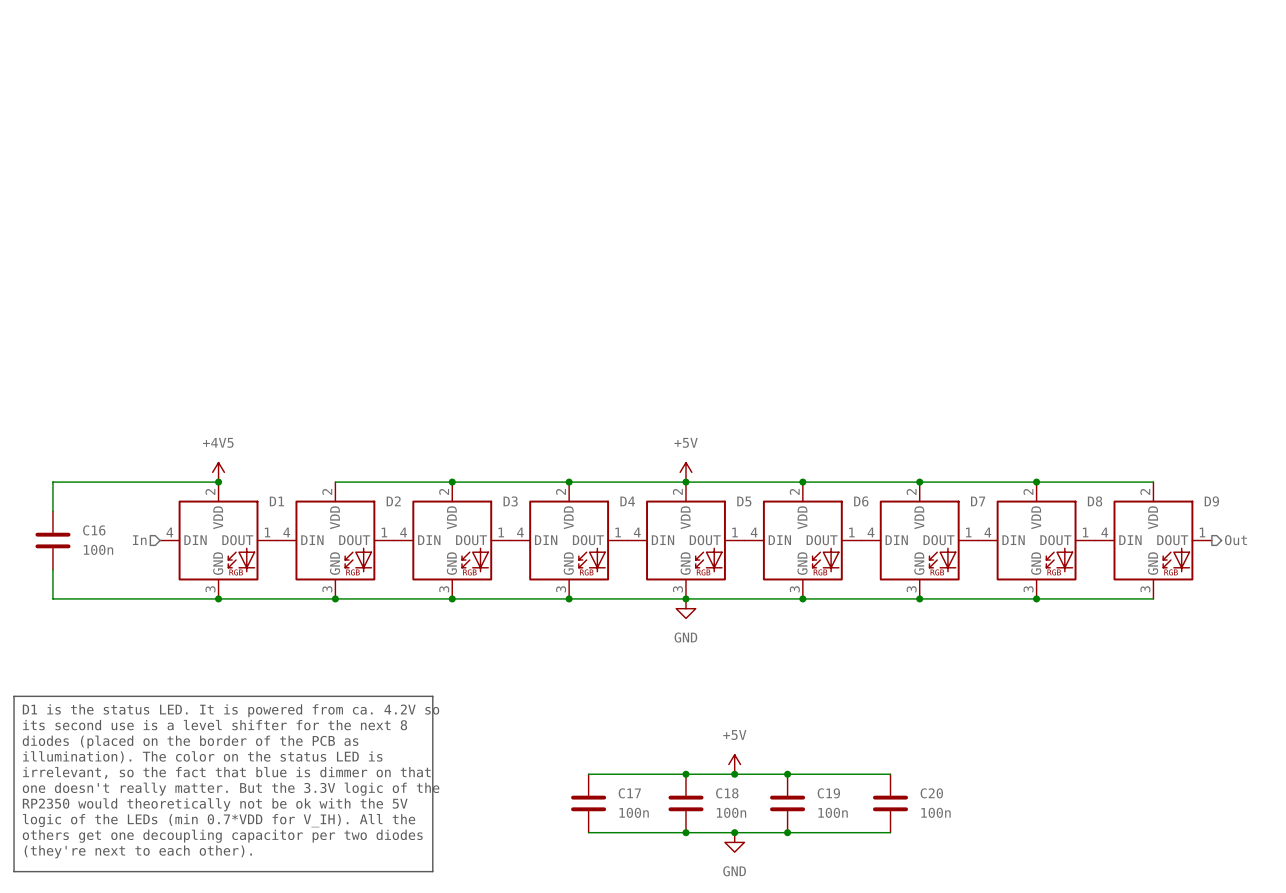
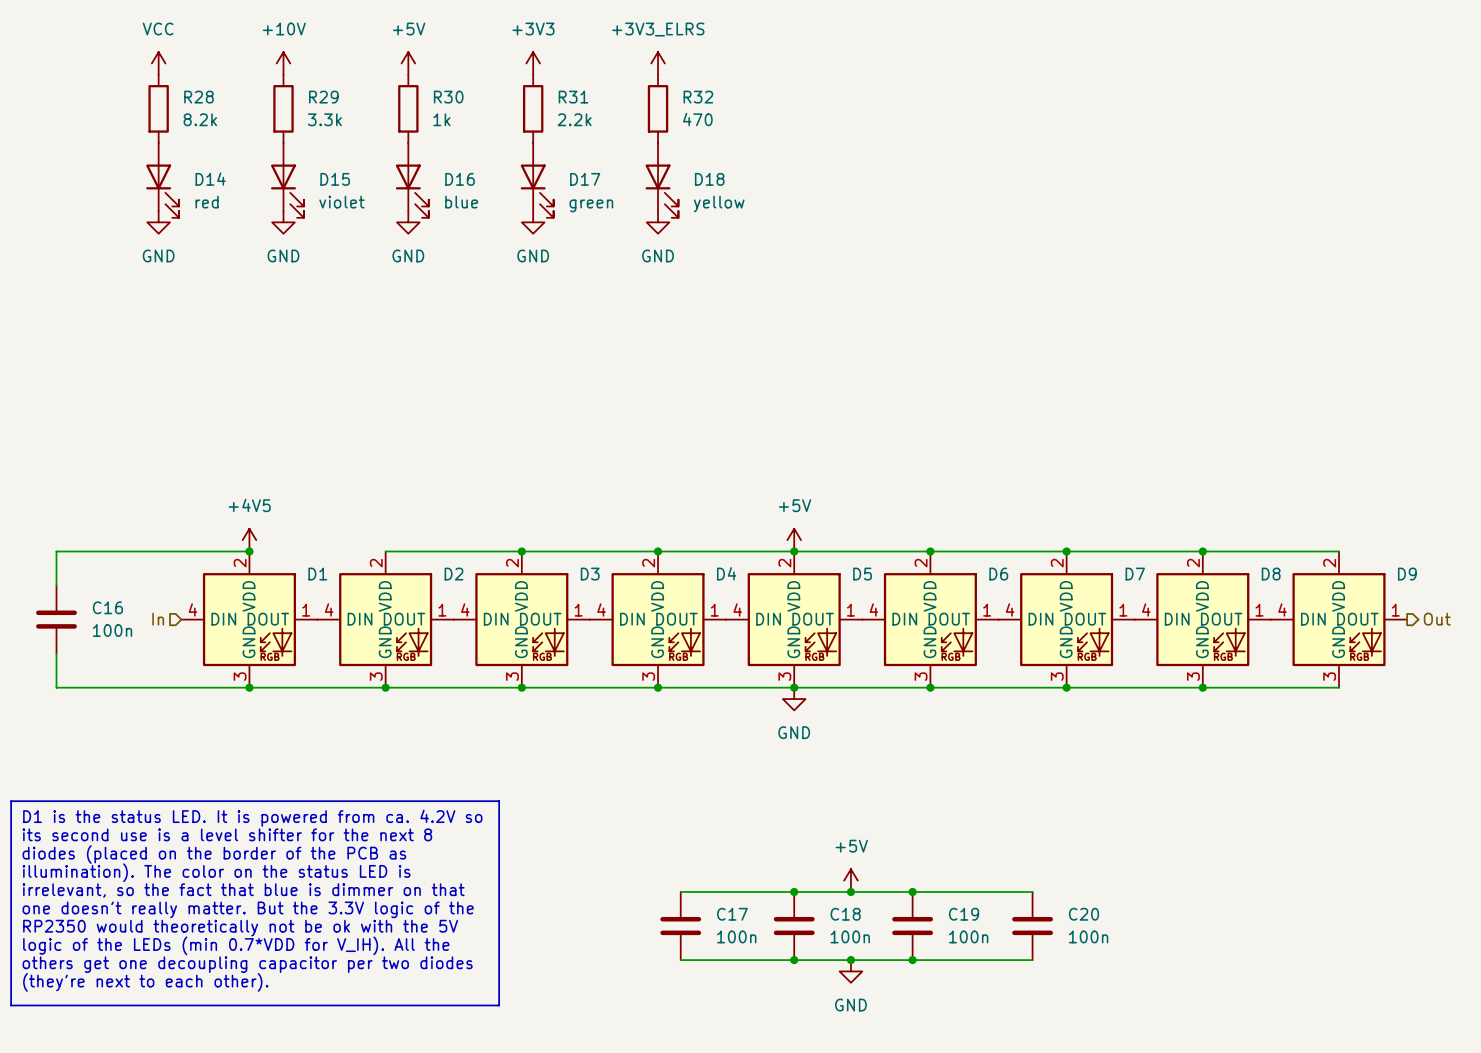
power symbol: none -> VCC (158, 63)
power symbol: none -> +10V (283, 63)
power symbol: none -> +5V (408, 63)
power symbol: none -> +3V3 (533, 63)
power symbol: none -> +3V3_ELRS (658, 63)
R28: none -> 8.2k (158, 108)
R29: none -> 3.3k (283, 108)
R30: none -> 1k (408, 108)
R31: none -> 2.2k (533, 108)
R32: none -> 470 (658, 108)
D14: none -> red (162, 180)
D15: none -> violet (287, 180)
D16: none -> blue (412, 180)
D17: none -> green (537, 180)
D18: none -> yellow (662, 180)
power symbol: none -> GND (158, 222)
power symbol: none -> GND (283, 222)
power symbol: none -> GND (408, 222)
power symbol: none -> GND (533, 222)
power symbol: none -> GND (658, 222)

